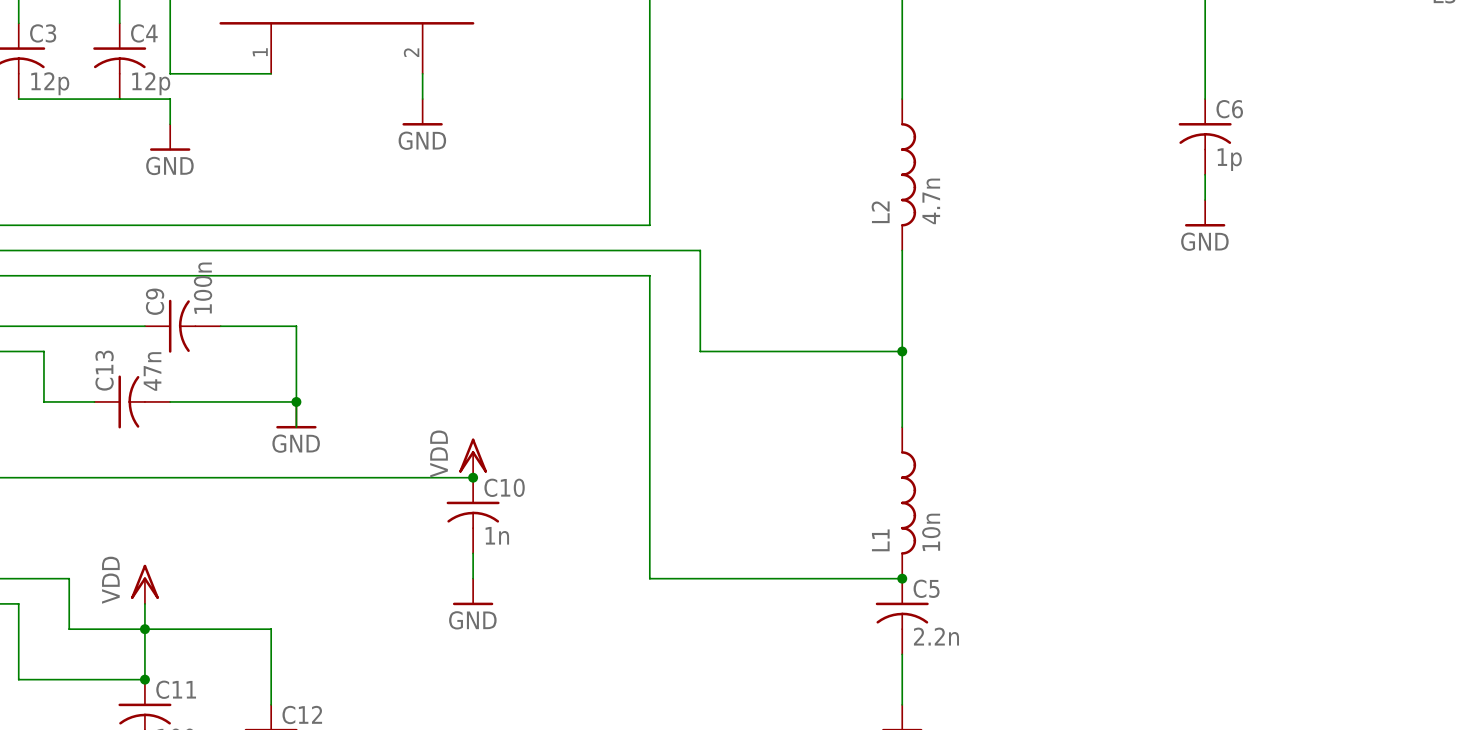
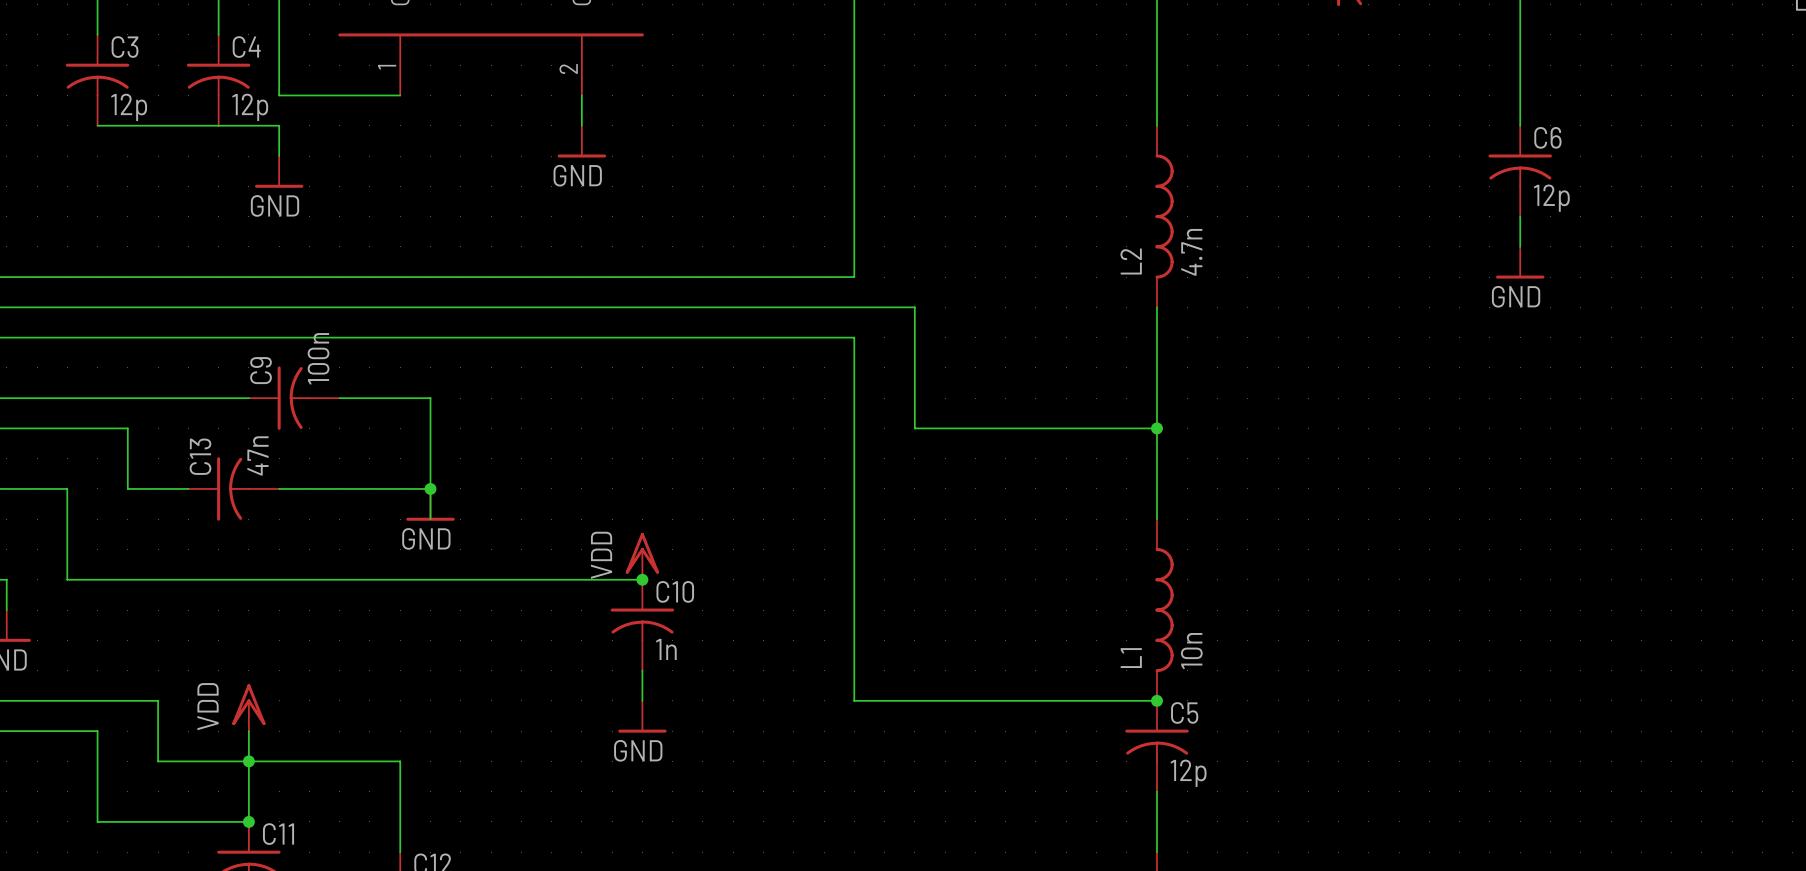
C6 value: 1p (1229, 159) -> 12p (1551, 198)
C5 value: 2.2n (936, 636) -> 12p (1188, 773)

